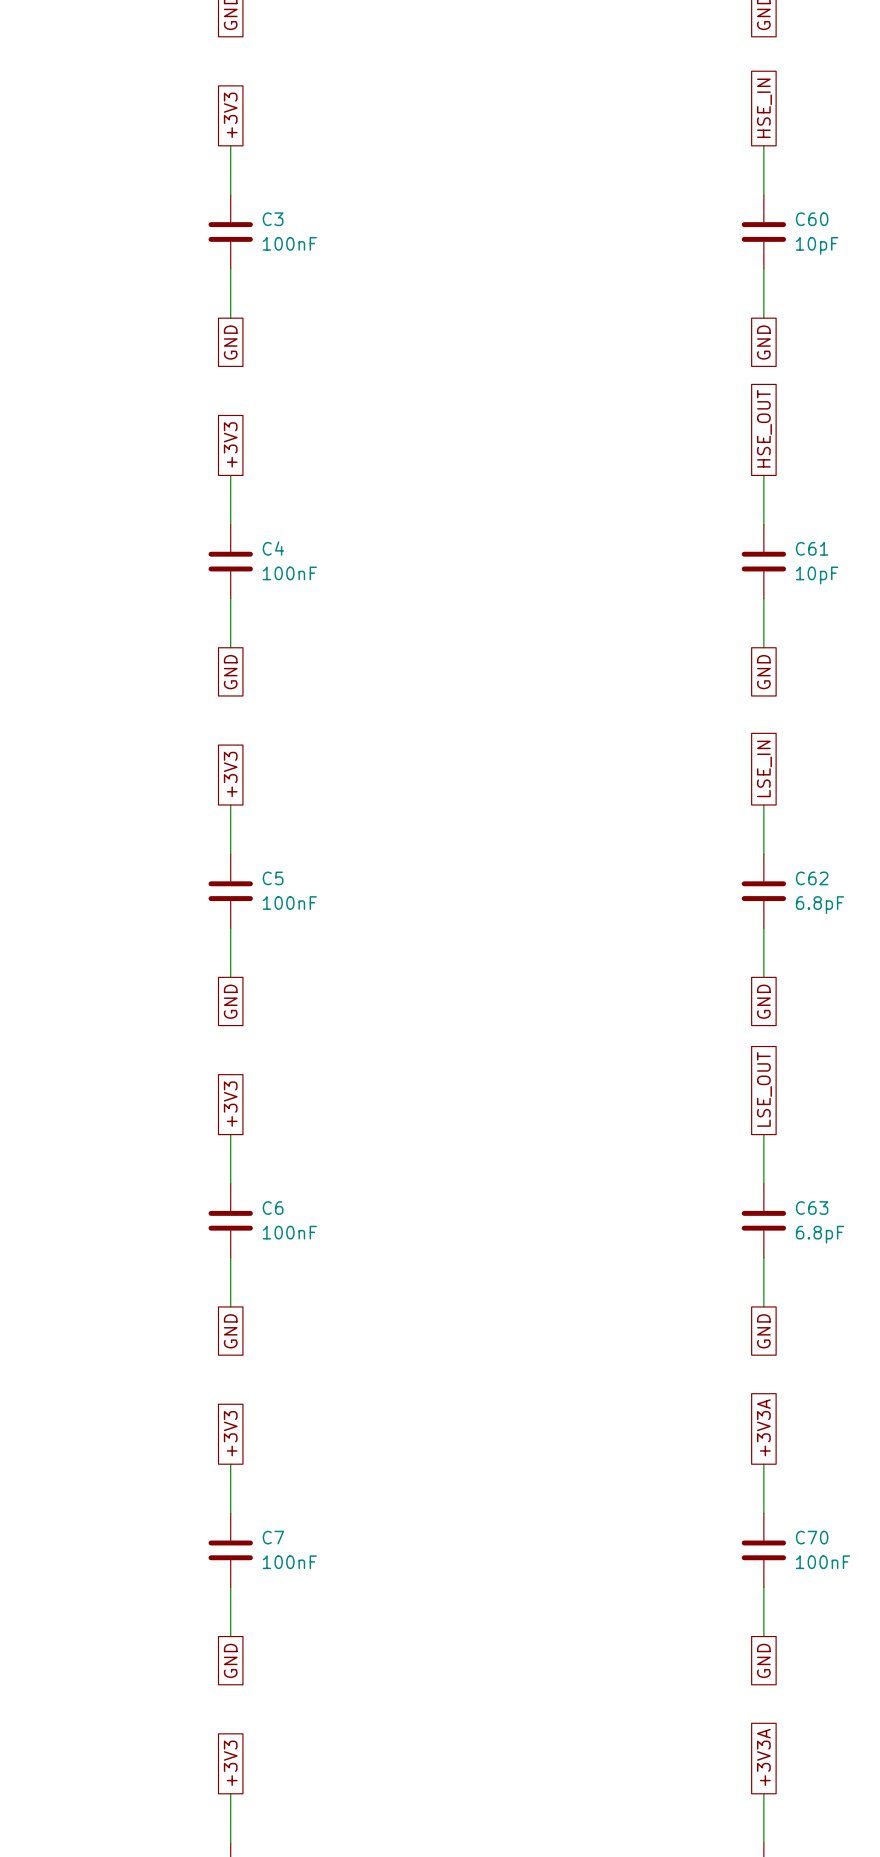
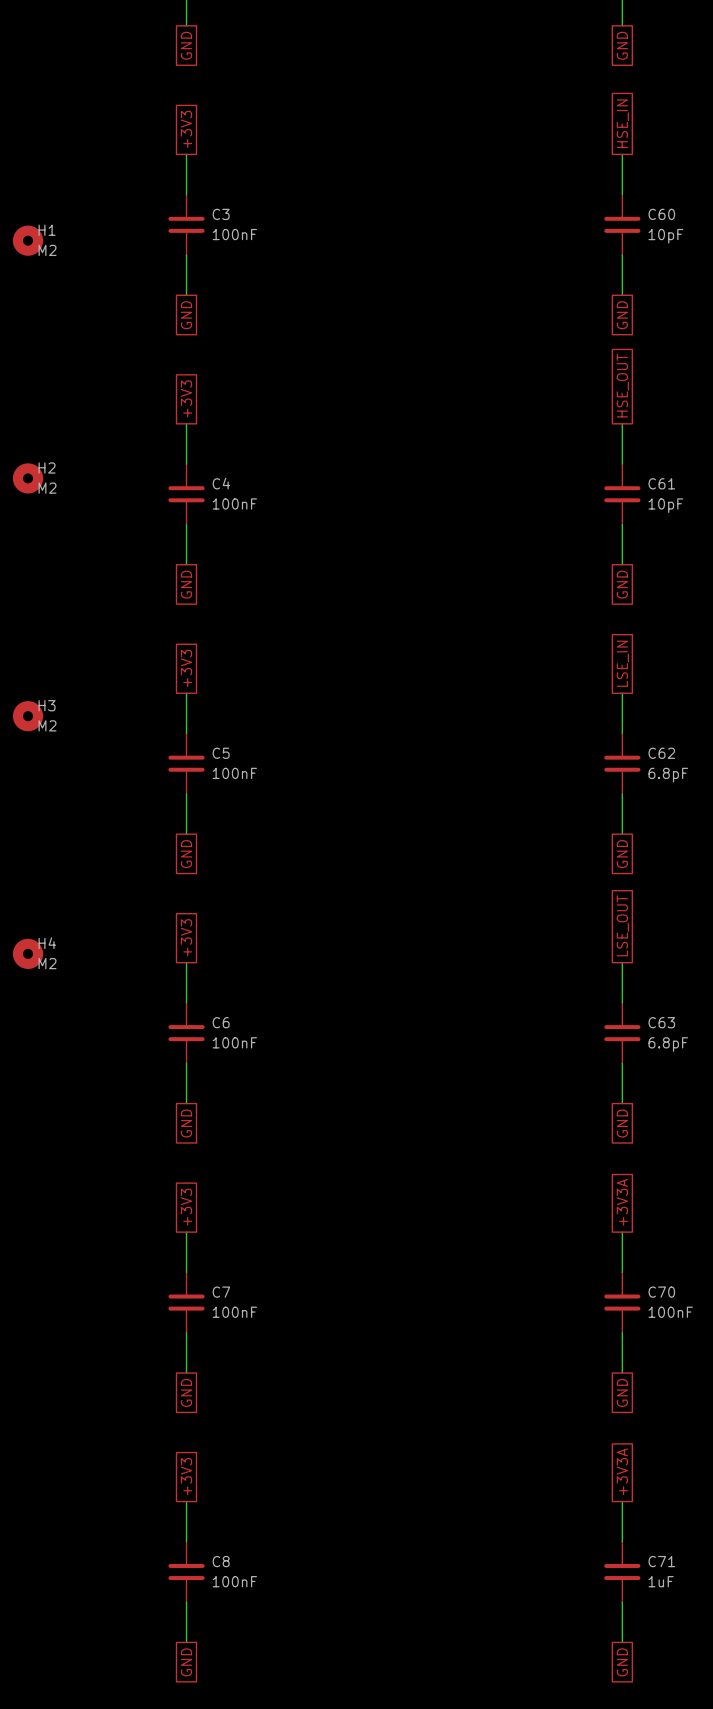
H1: none -> M2 (28, 240)
H2: none -> M2 (28, 478)
H3: none -> M2 (28, 716)
H4: none -> M2 (28, 953)

